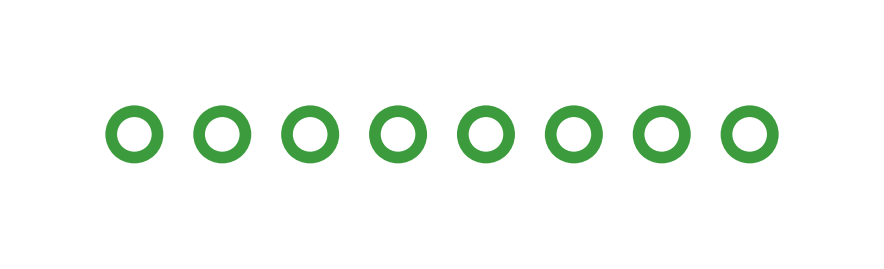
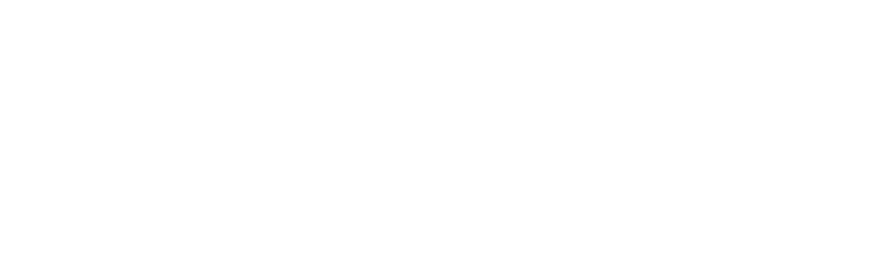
part: (442, 134) -> none

